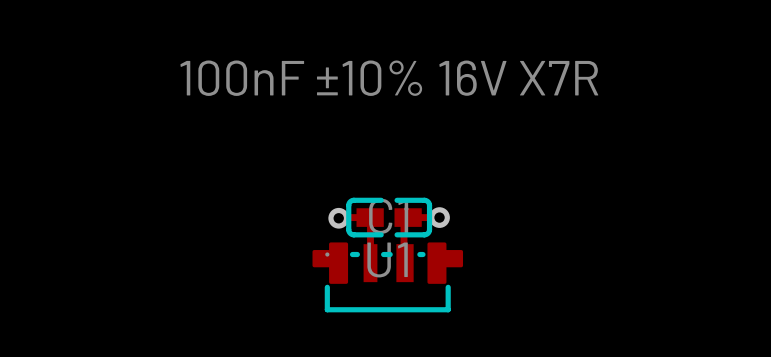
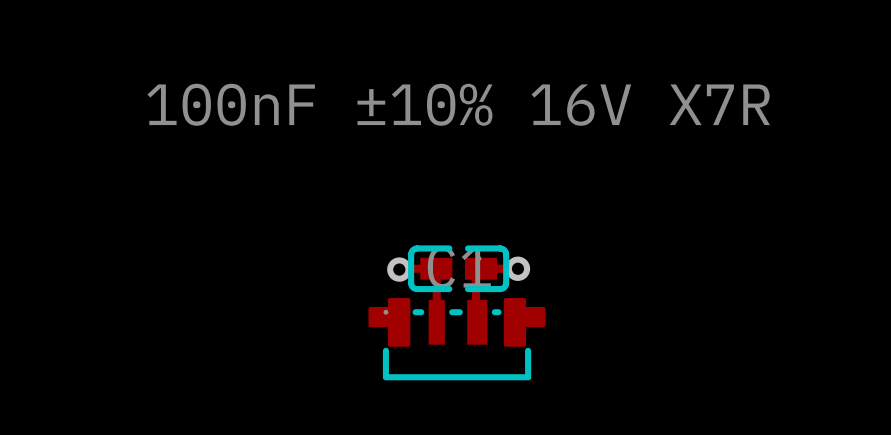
U1 name: U1 (387, 259) -> none

